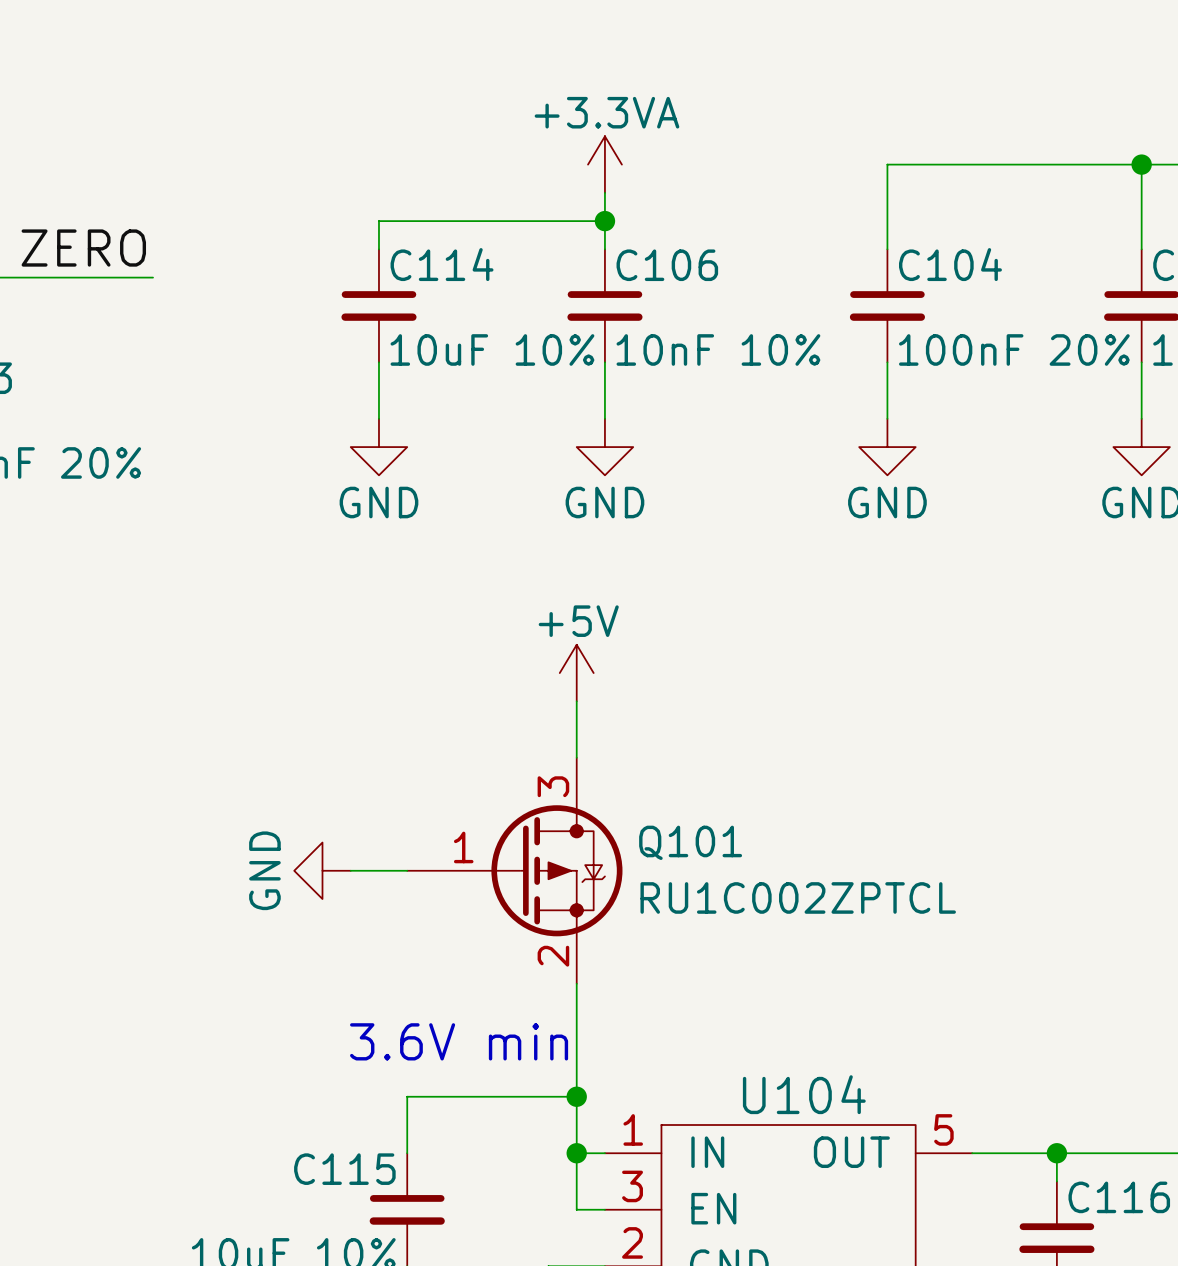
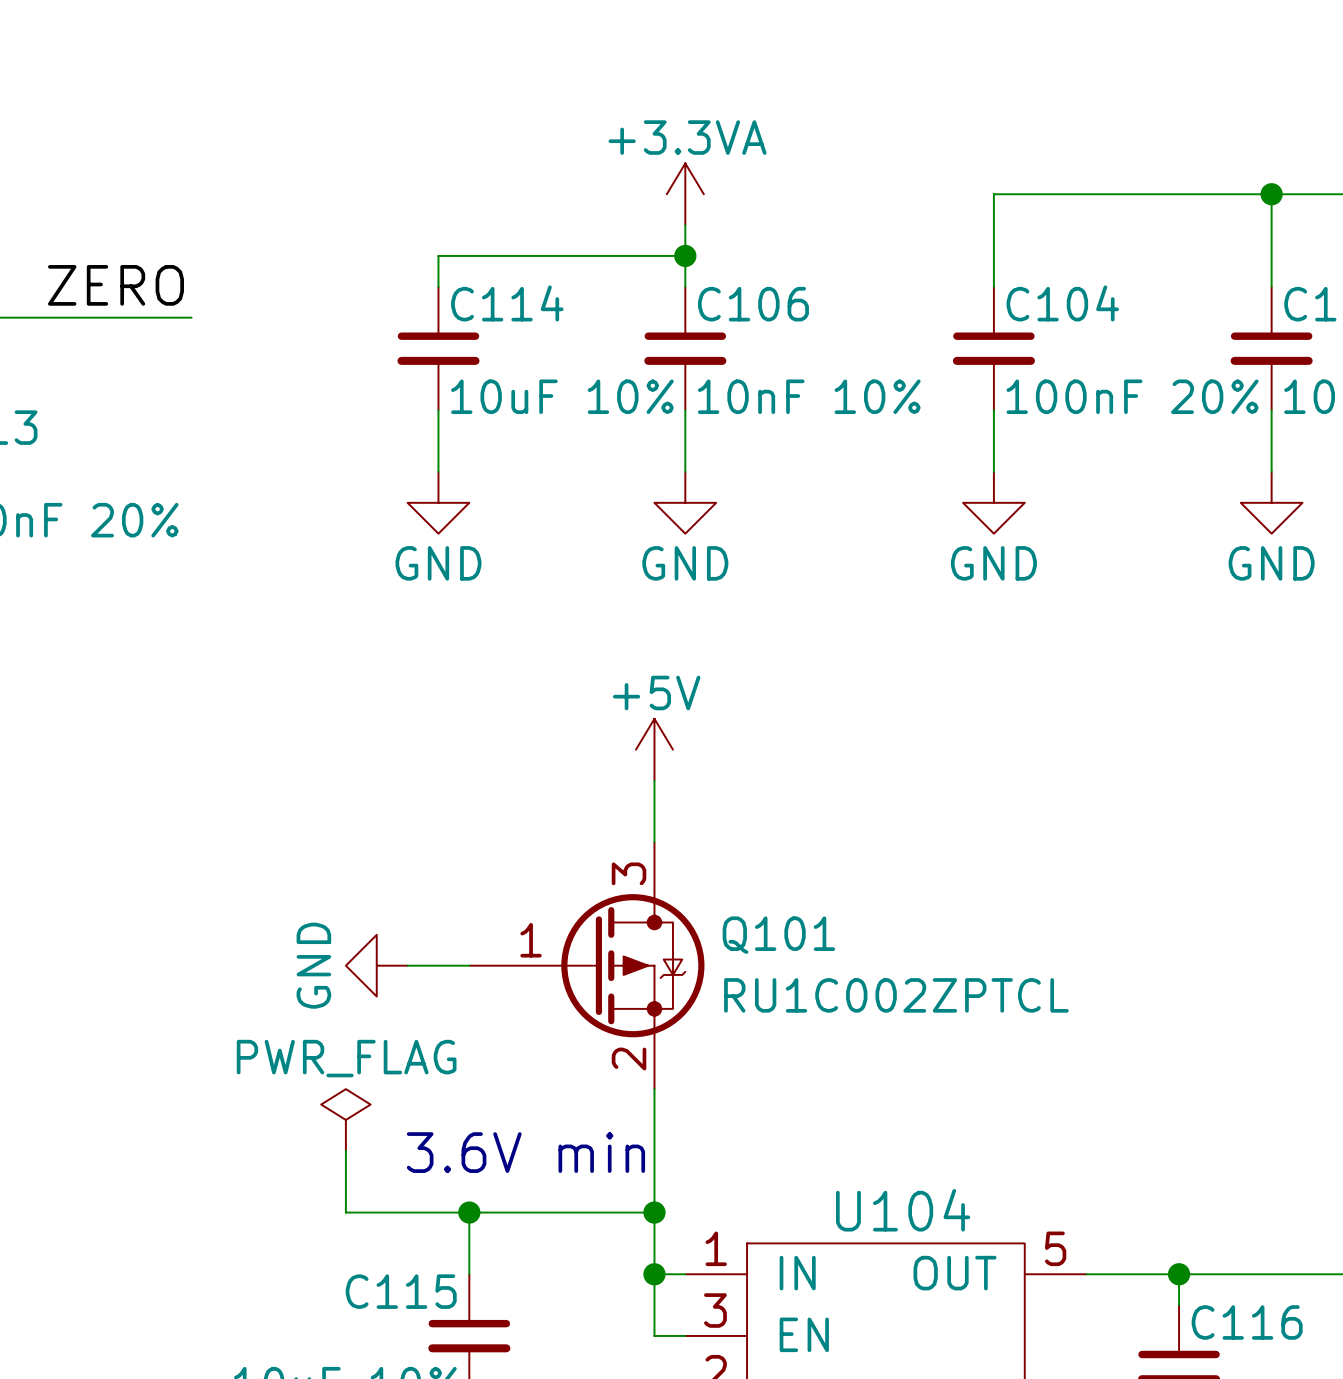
power symbol: none -> PWR_FLAG (345, 1119)
wire: none -> (345, 1150) (345, 1212) (469, 1212)
junction: none -> (469, 1212)

